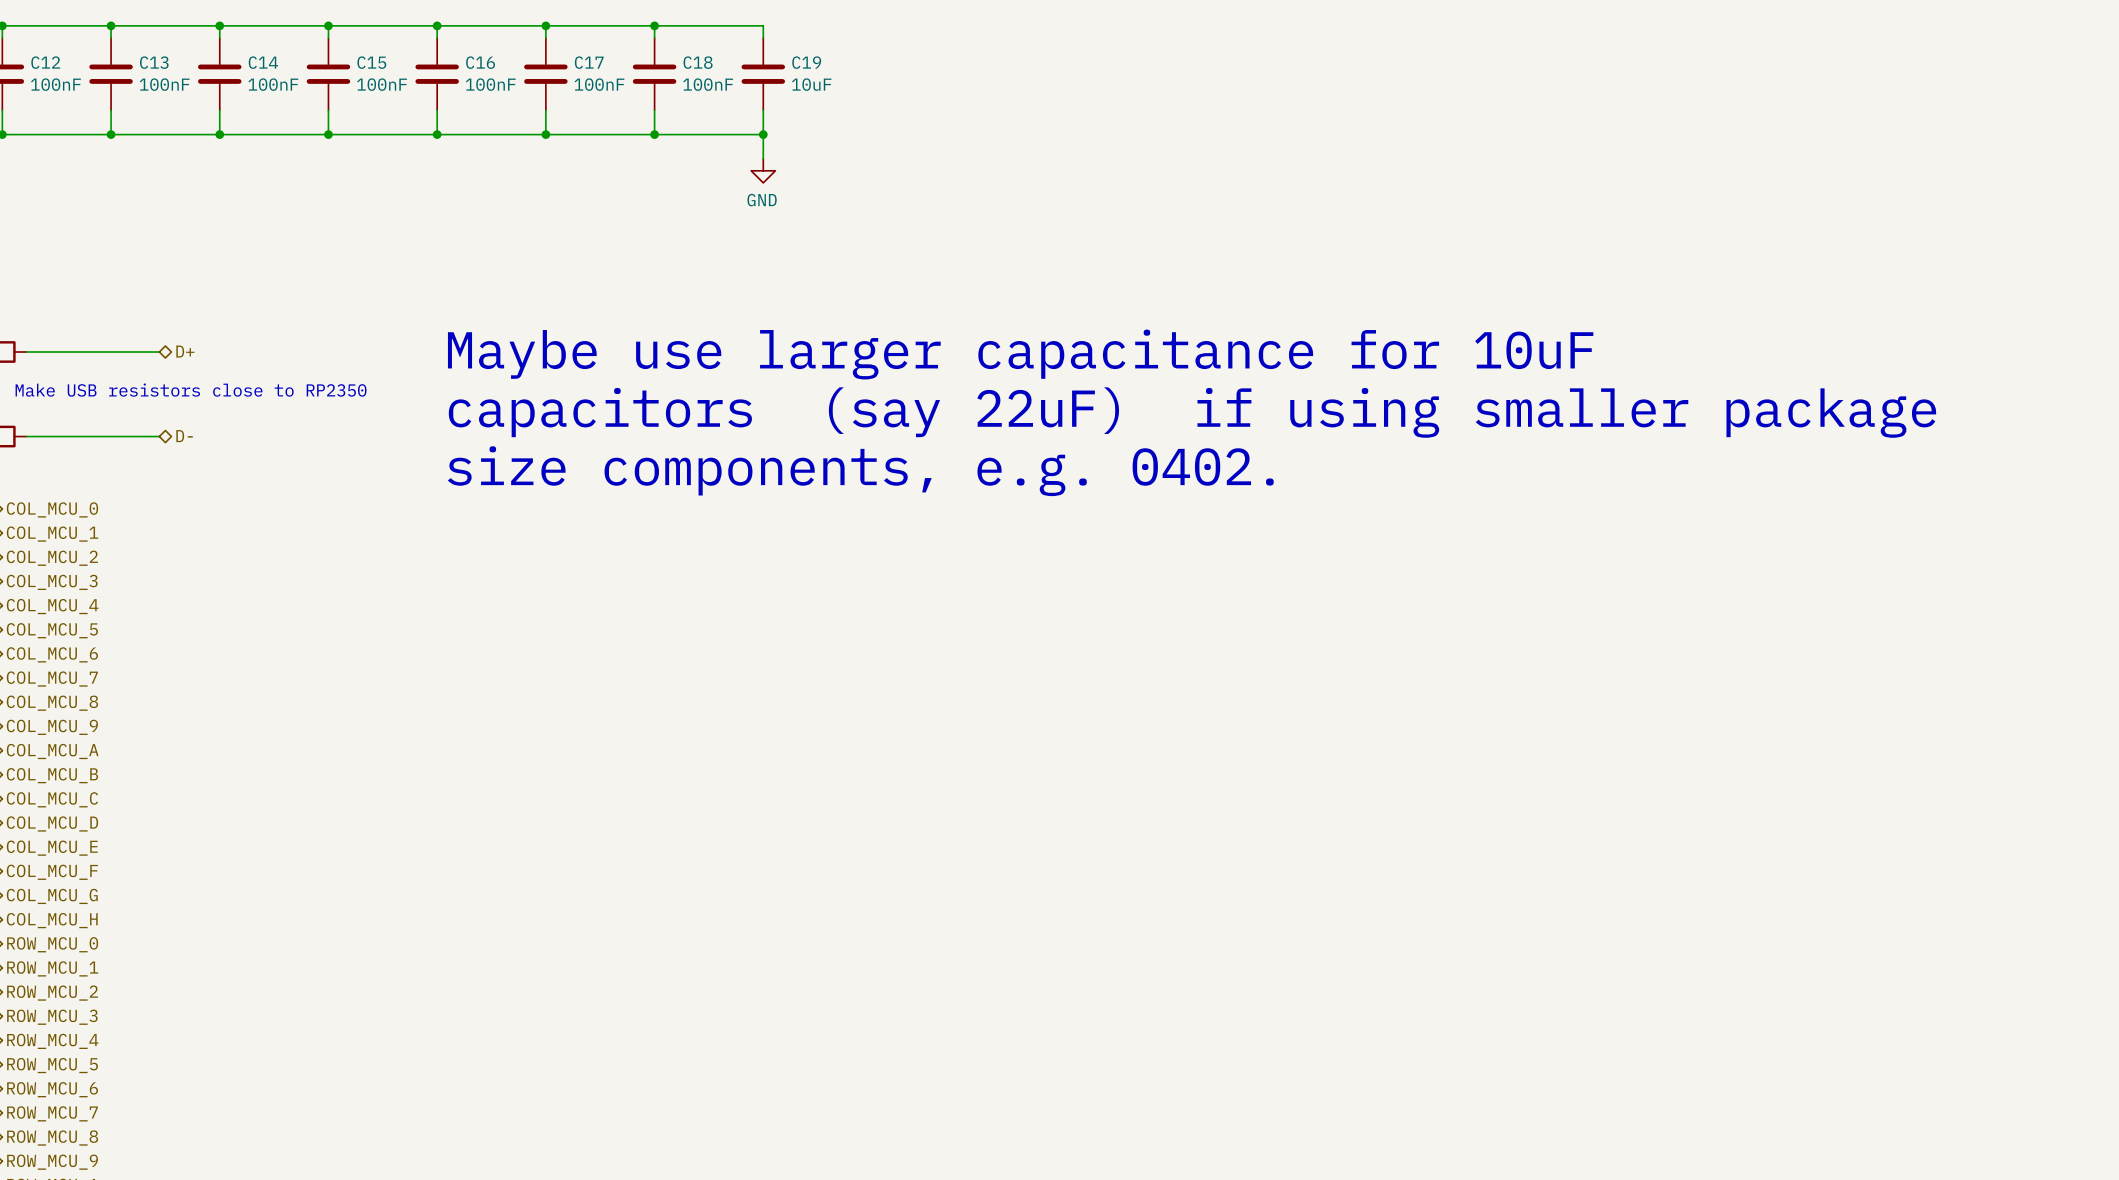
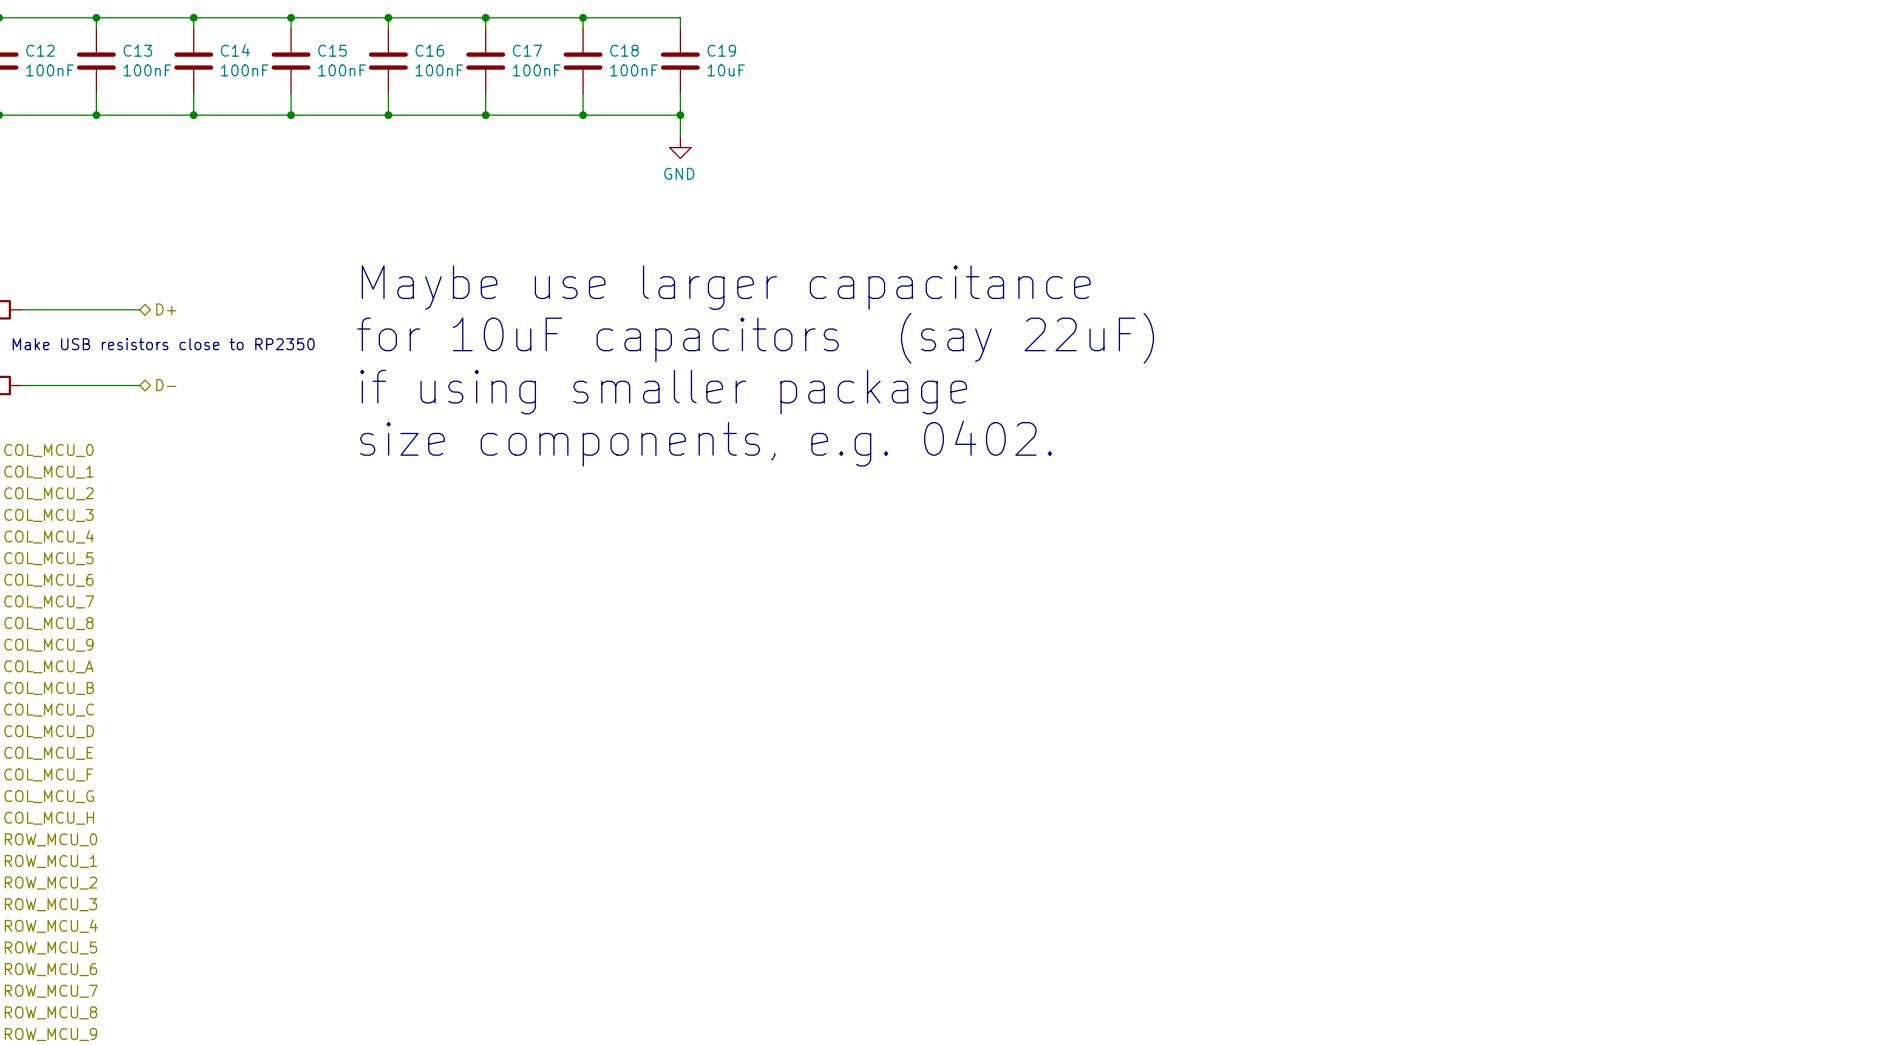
text: Maybe use larger capacitance for 10uF (1020, 354) -> Maybe use larger capacitance (726, 287)
text: none -> for 10uF capacitors (say 22uF) (755, 338)
text: capacitors (say 22uF) if using smaller package (1192, 412) -> if using smaller package (663, 392)
text position: size components, e.g. 0402. (860, 471) -> size components, e.g. 0402. (706, 443)

